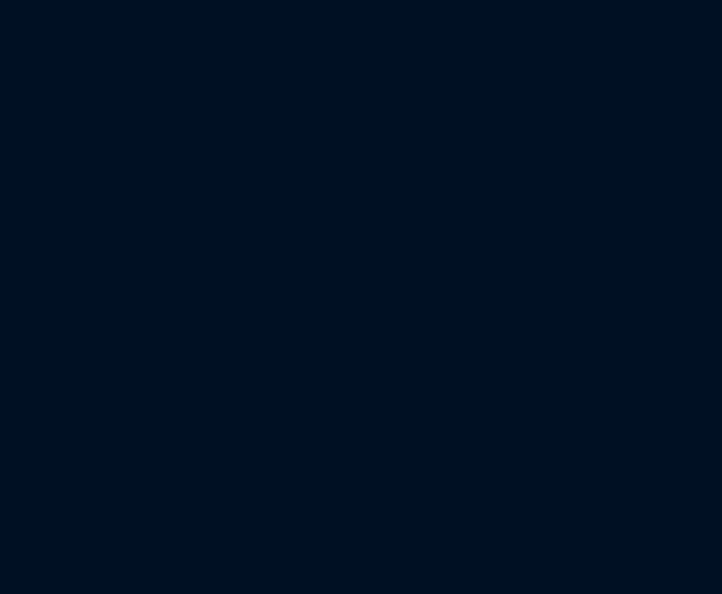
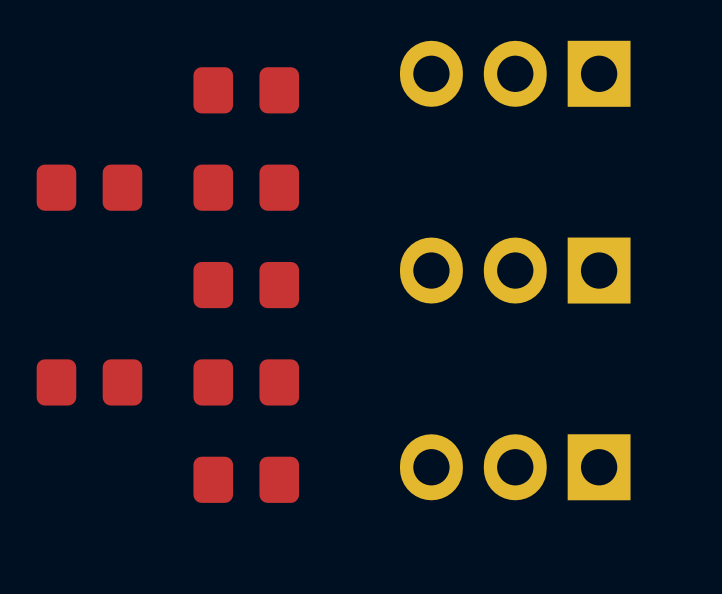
part: none -> (515, 73)
part: none -> (246, 90)
part: none -> (89, 187)
part: none -> (246, 187)
part: none -> (515, 270)
part: none -> (246, 285)
part: none -> (89, 382)
part: none -> (246, 382)
part: none -> (515, 467)
part: none -> (246, 479)

